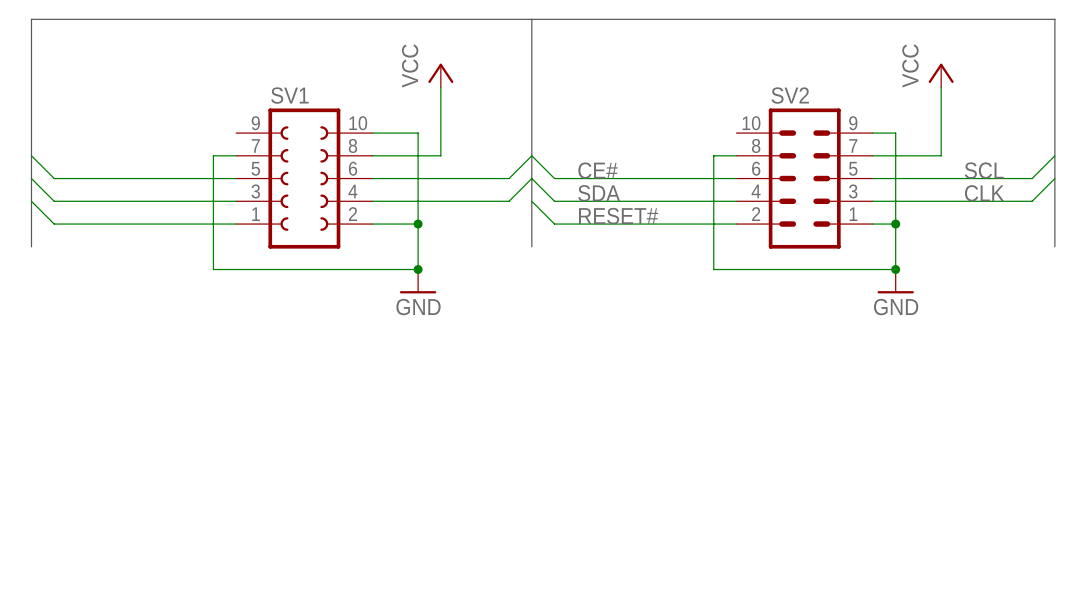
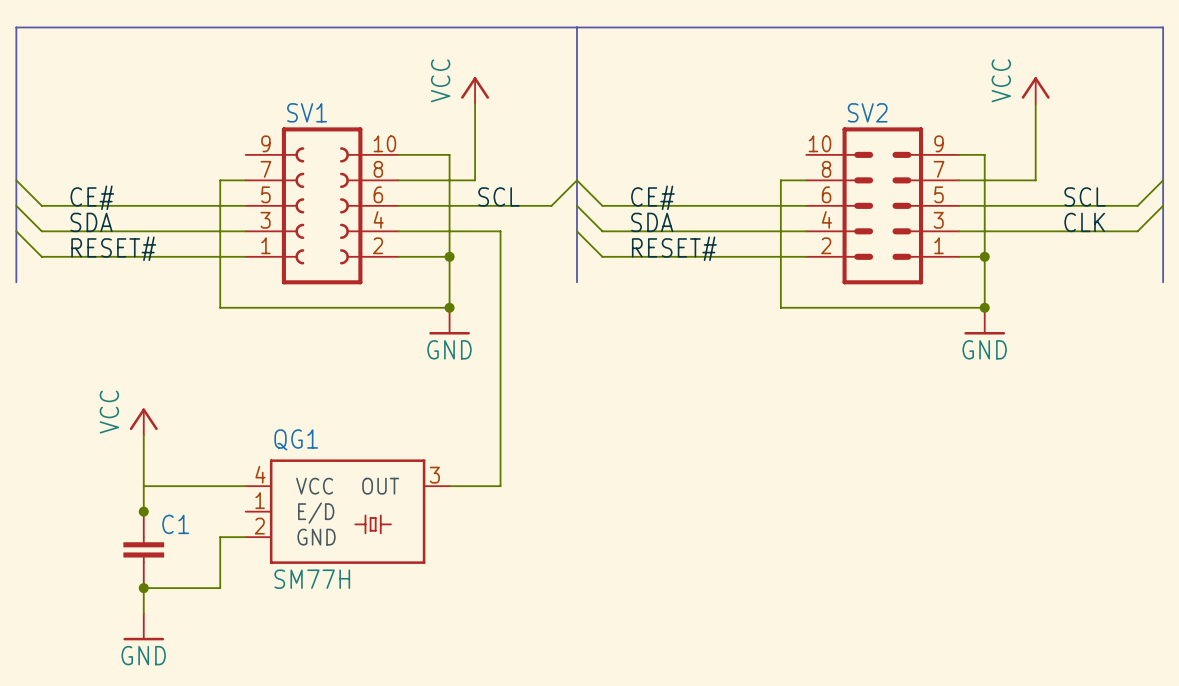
label: none -> CE# (92, 197)
label: none -> SCL (498, 196)
wire: (531, 178) (509, 201) (463, 201) -> (449, 486) (500, 486) (500, 231)
label: none -> SDA (91, 222)
label: none -> RESET# (113, 248)
power symbol: none -> VCC (143, 421)
wire: none -> (143, 435) (143, 511)
wire: none -> (143, 486) (245, 486)
junction: none -> (143, 511)
QG1: none -> SM77H (347, 511)
wire: none -> (245, 537) (220, 537) (220, 588) (143, 588) (143, 613)
C1: none -> (143, 549)
junction: none -> (143, 588)
power symbol: none -> GND (143, 626)

